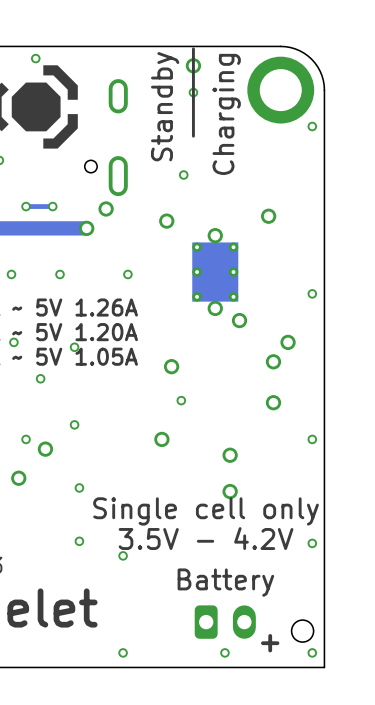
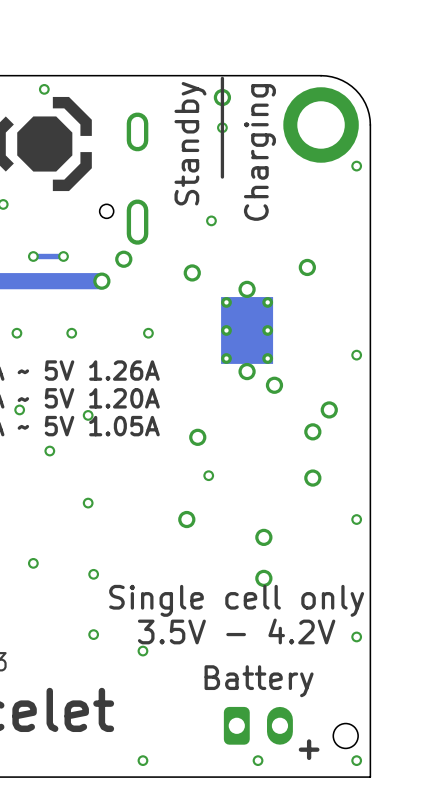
via position: (26, 439) -> (33, 563)
via: (45, 449) -> none
via: (18, 478) -> none

